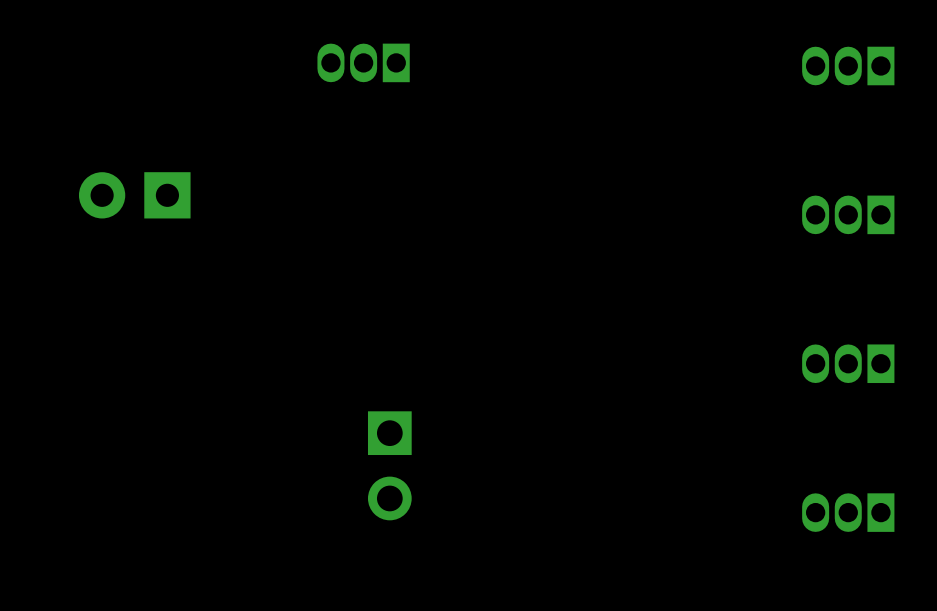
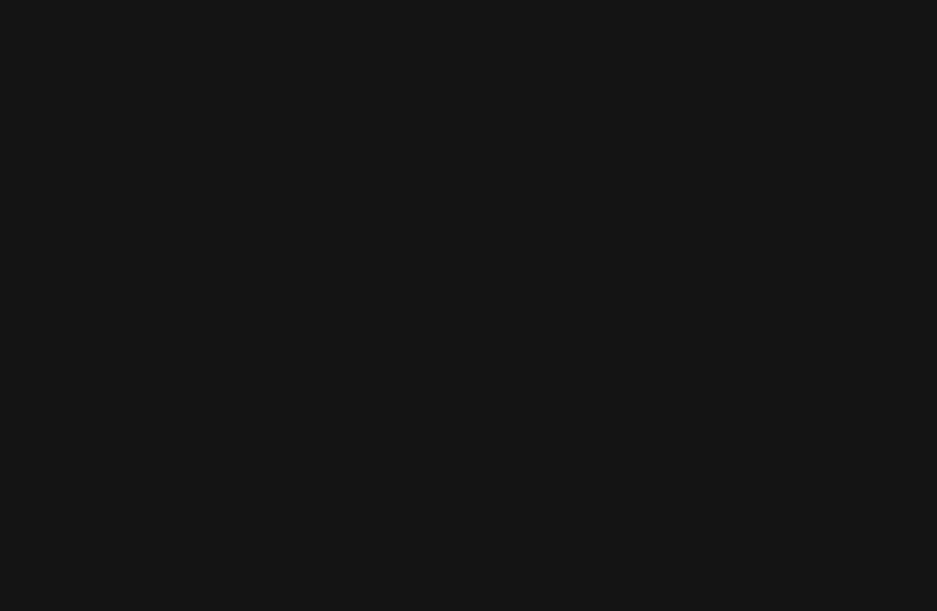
part: (363, 62) -> none
part: (848, 65) -> none
part: (134, 195) -> none
part: (848, 214) -> none
part: (848, 363) -> none
part: (389, 465) -> none
part: (848, 512) -> none

